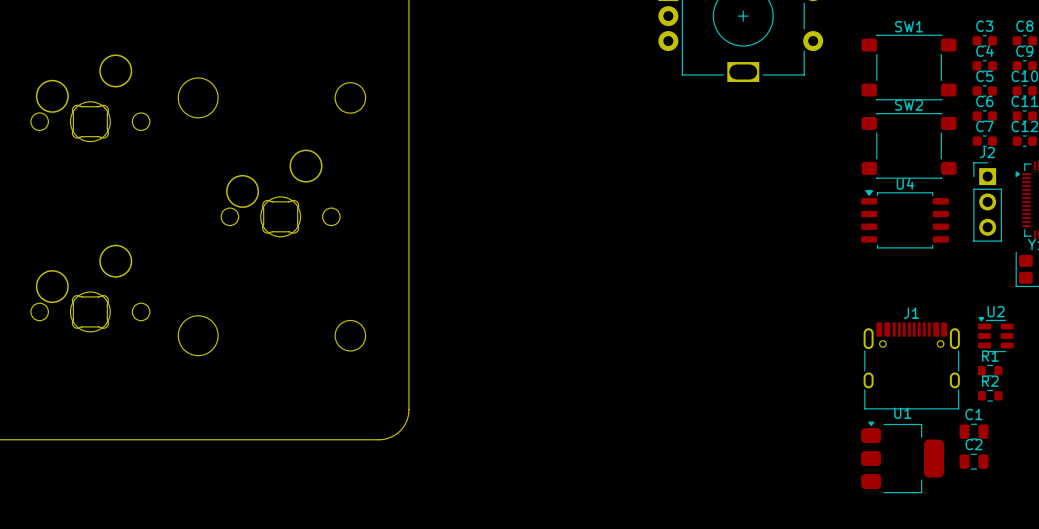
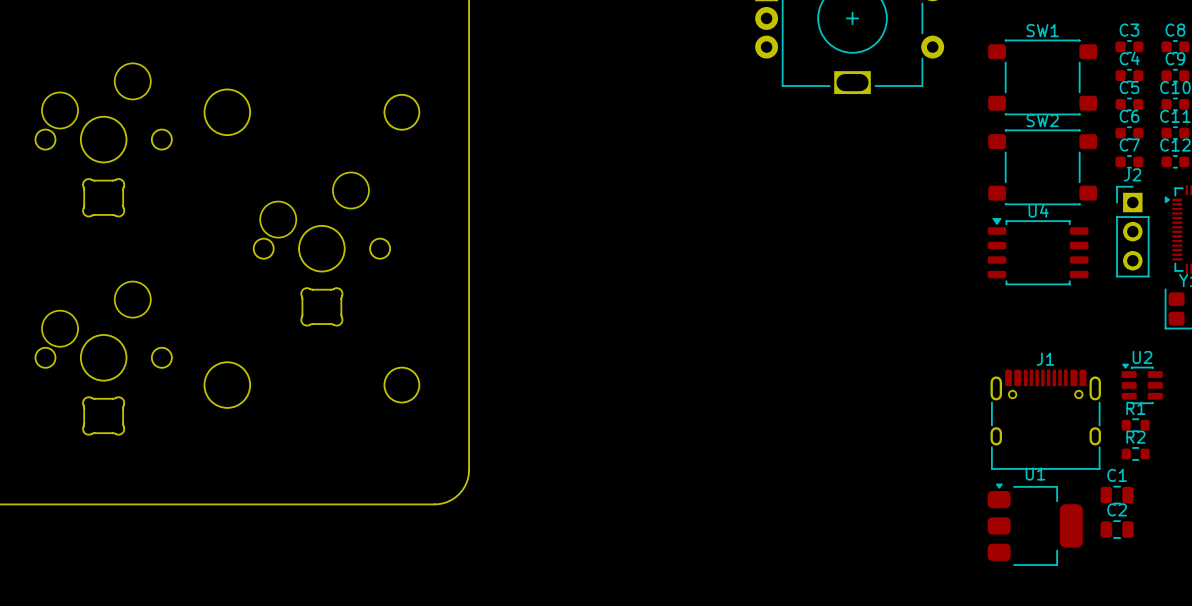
part position: (90, 121) -> (103, 197)
part position: (280, 216) -> (321, 306)
part position: (90, 311) -> (103, 415)

